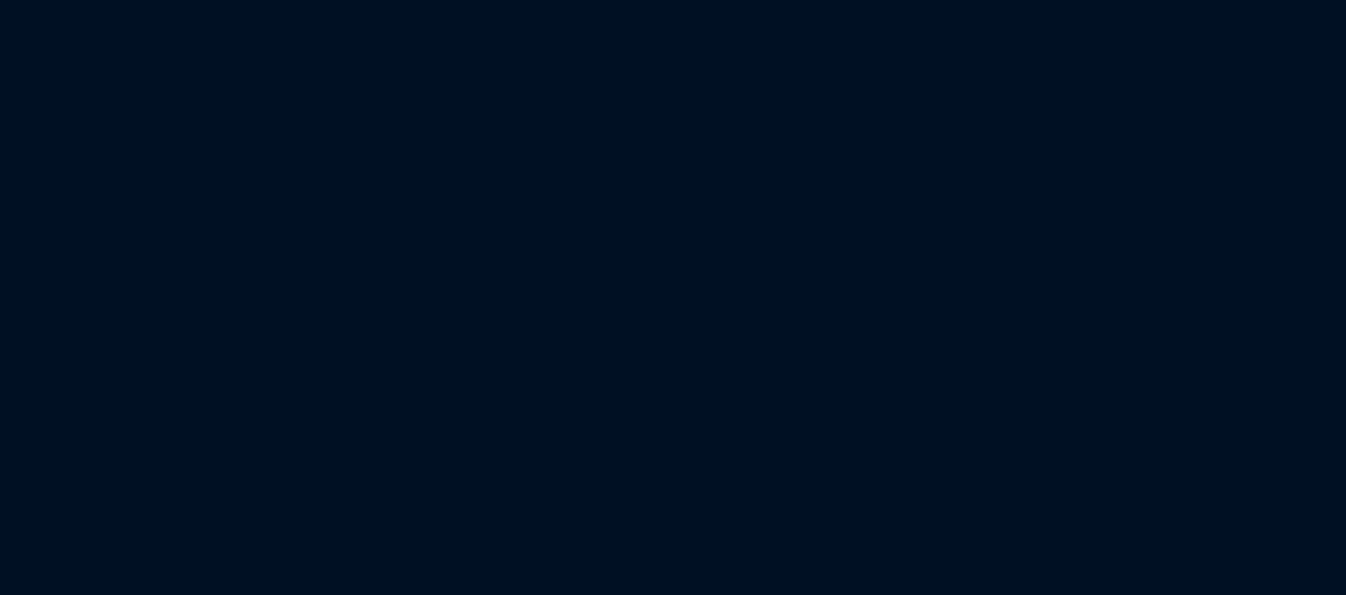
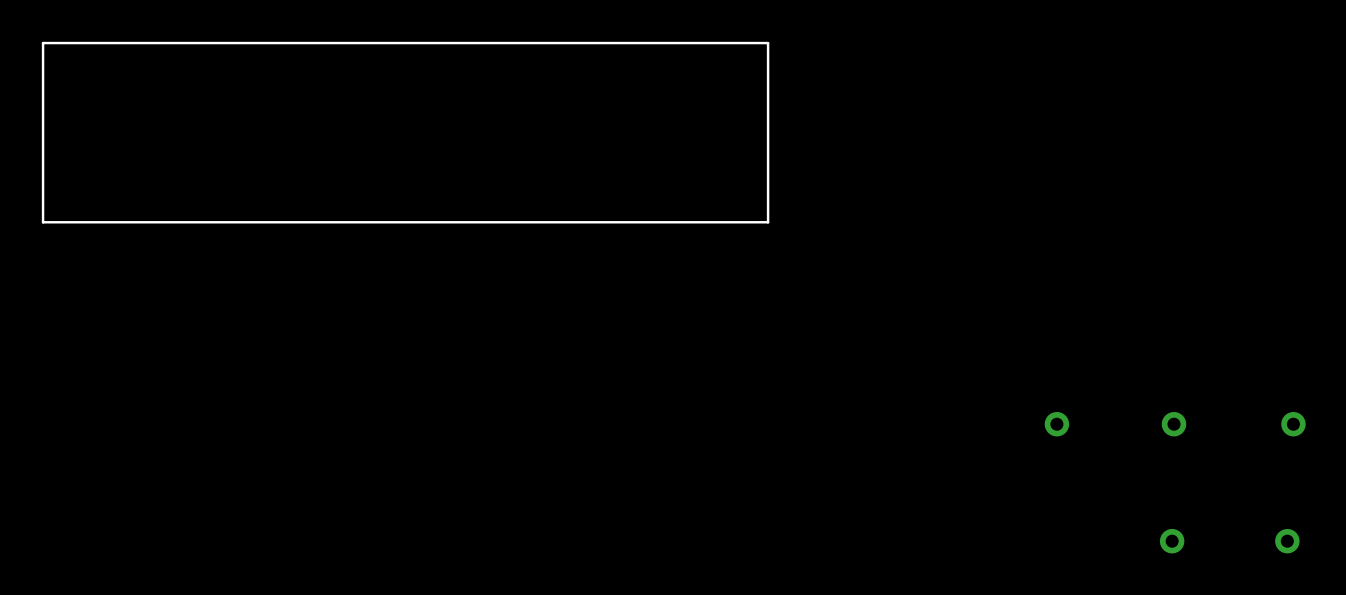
board edge: none -> (768, 43) (768, 222) (43, 222) (43, 43) (768, 43)
part: none -> (1056, 424)
part: none -> (1174, 424)
part: none -> (1293, 424)
part: none -> (1172, 541)
part: none -> (1287, 541)

